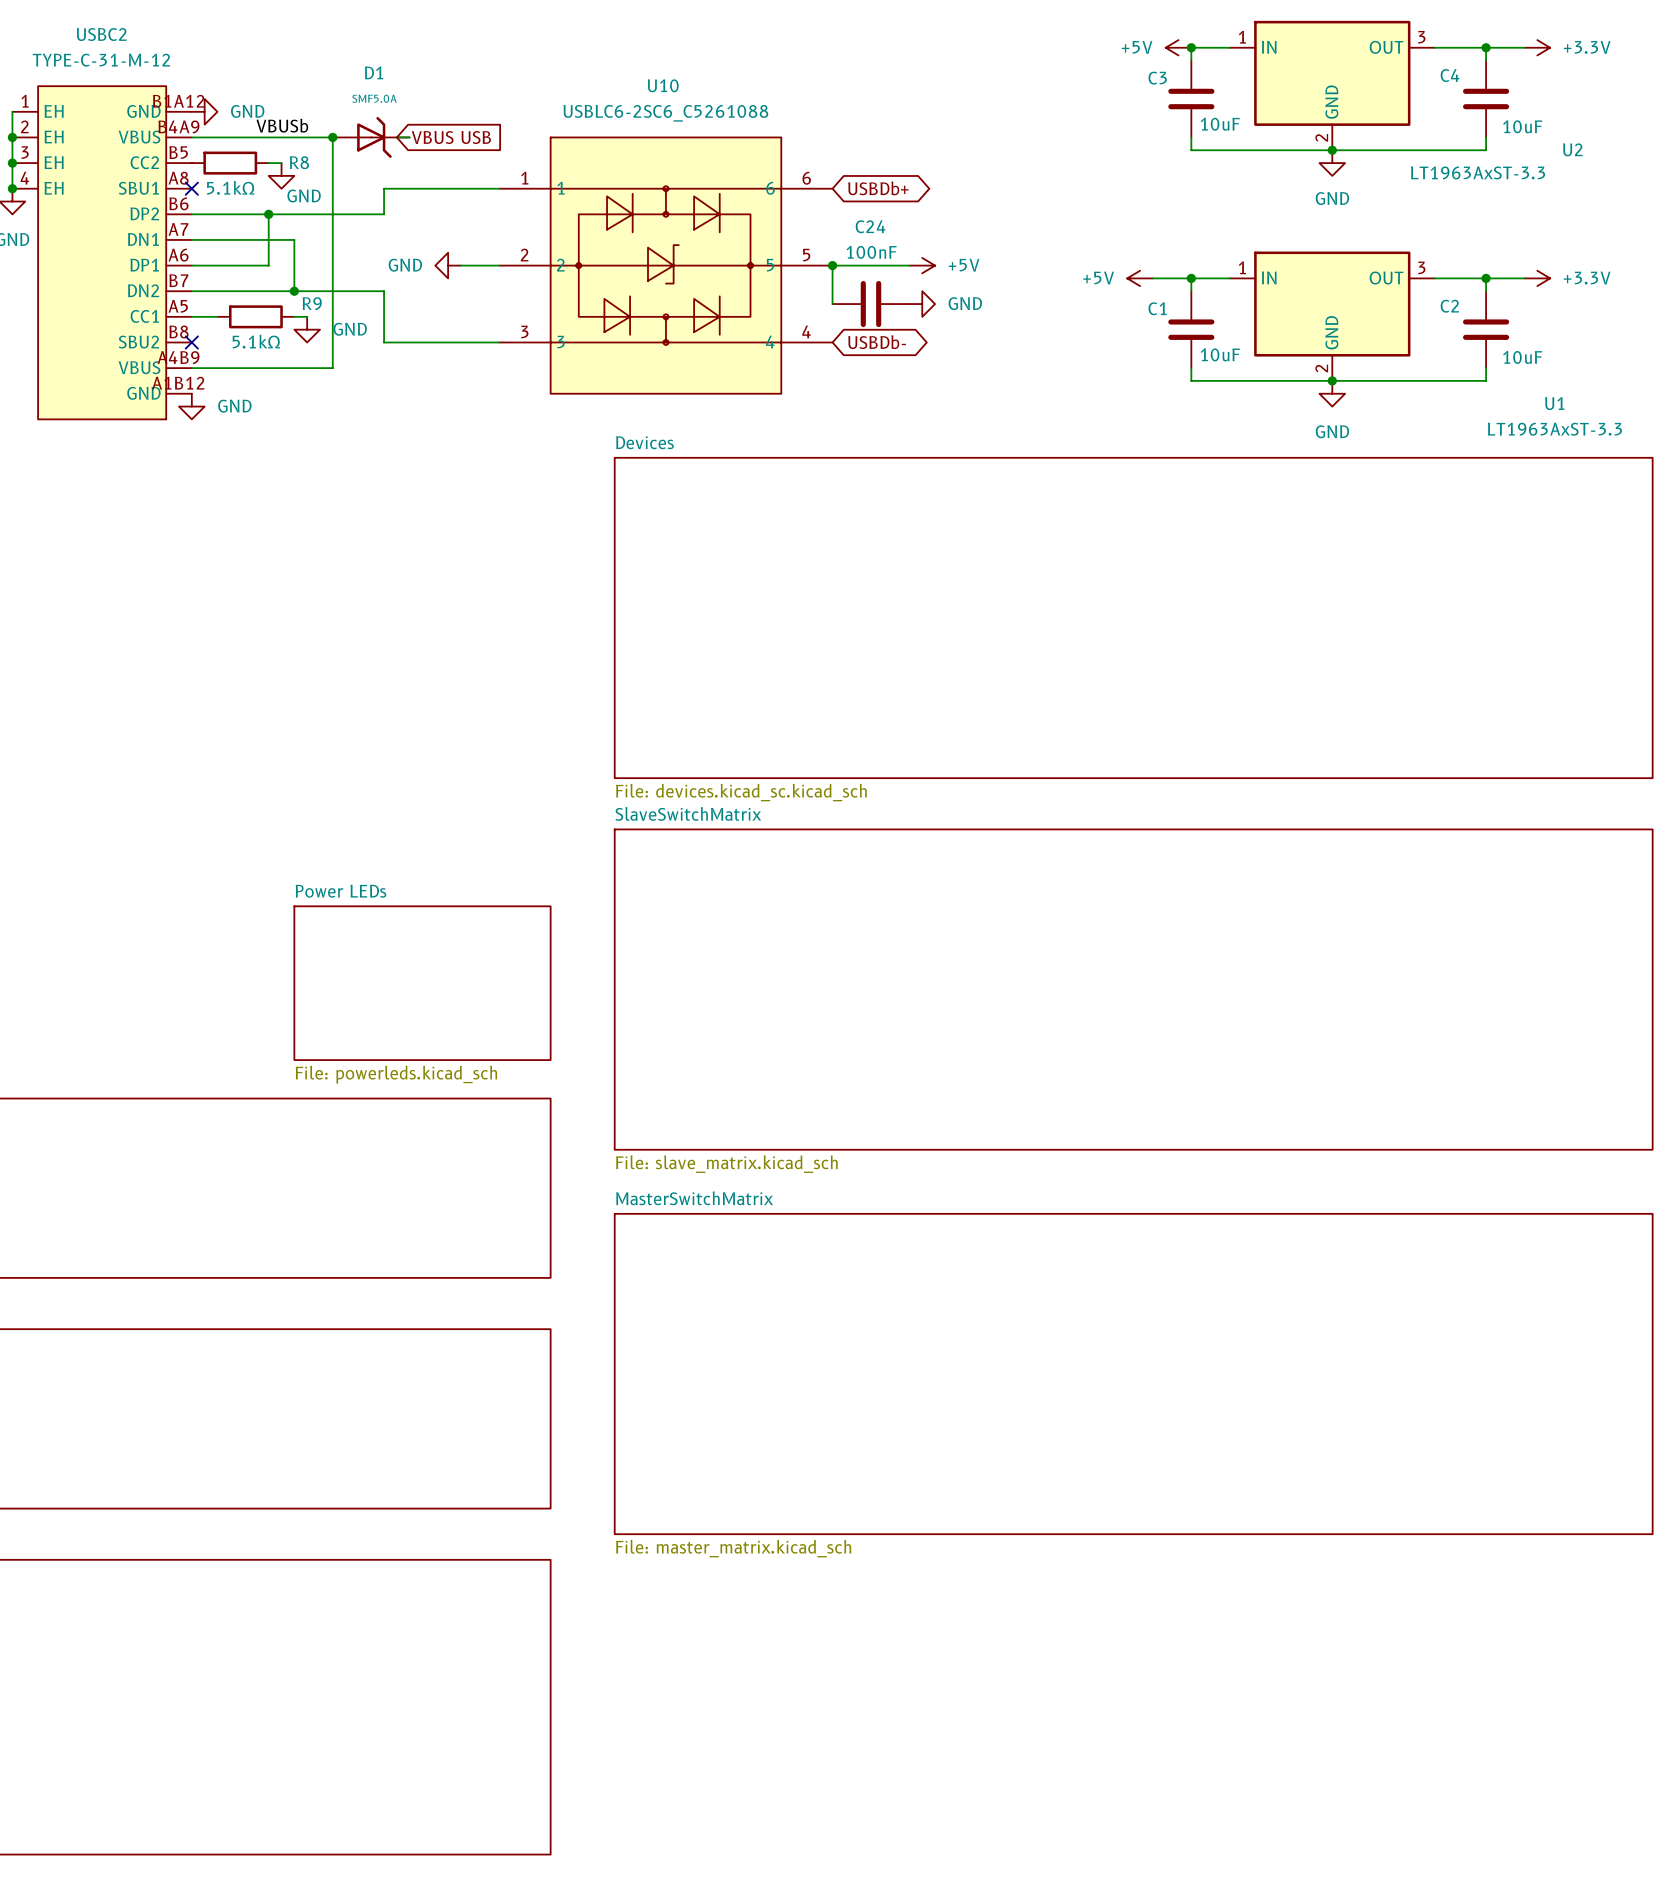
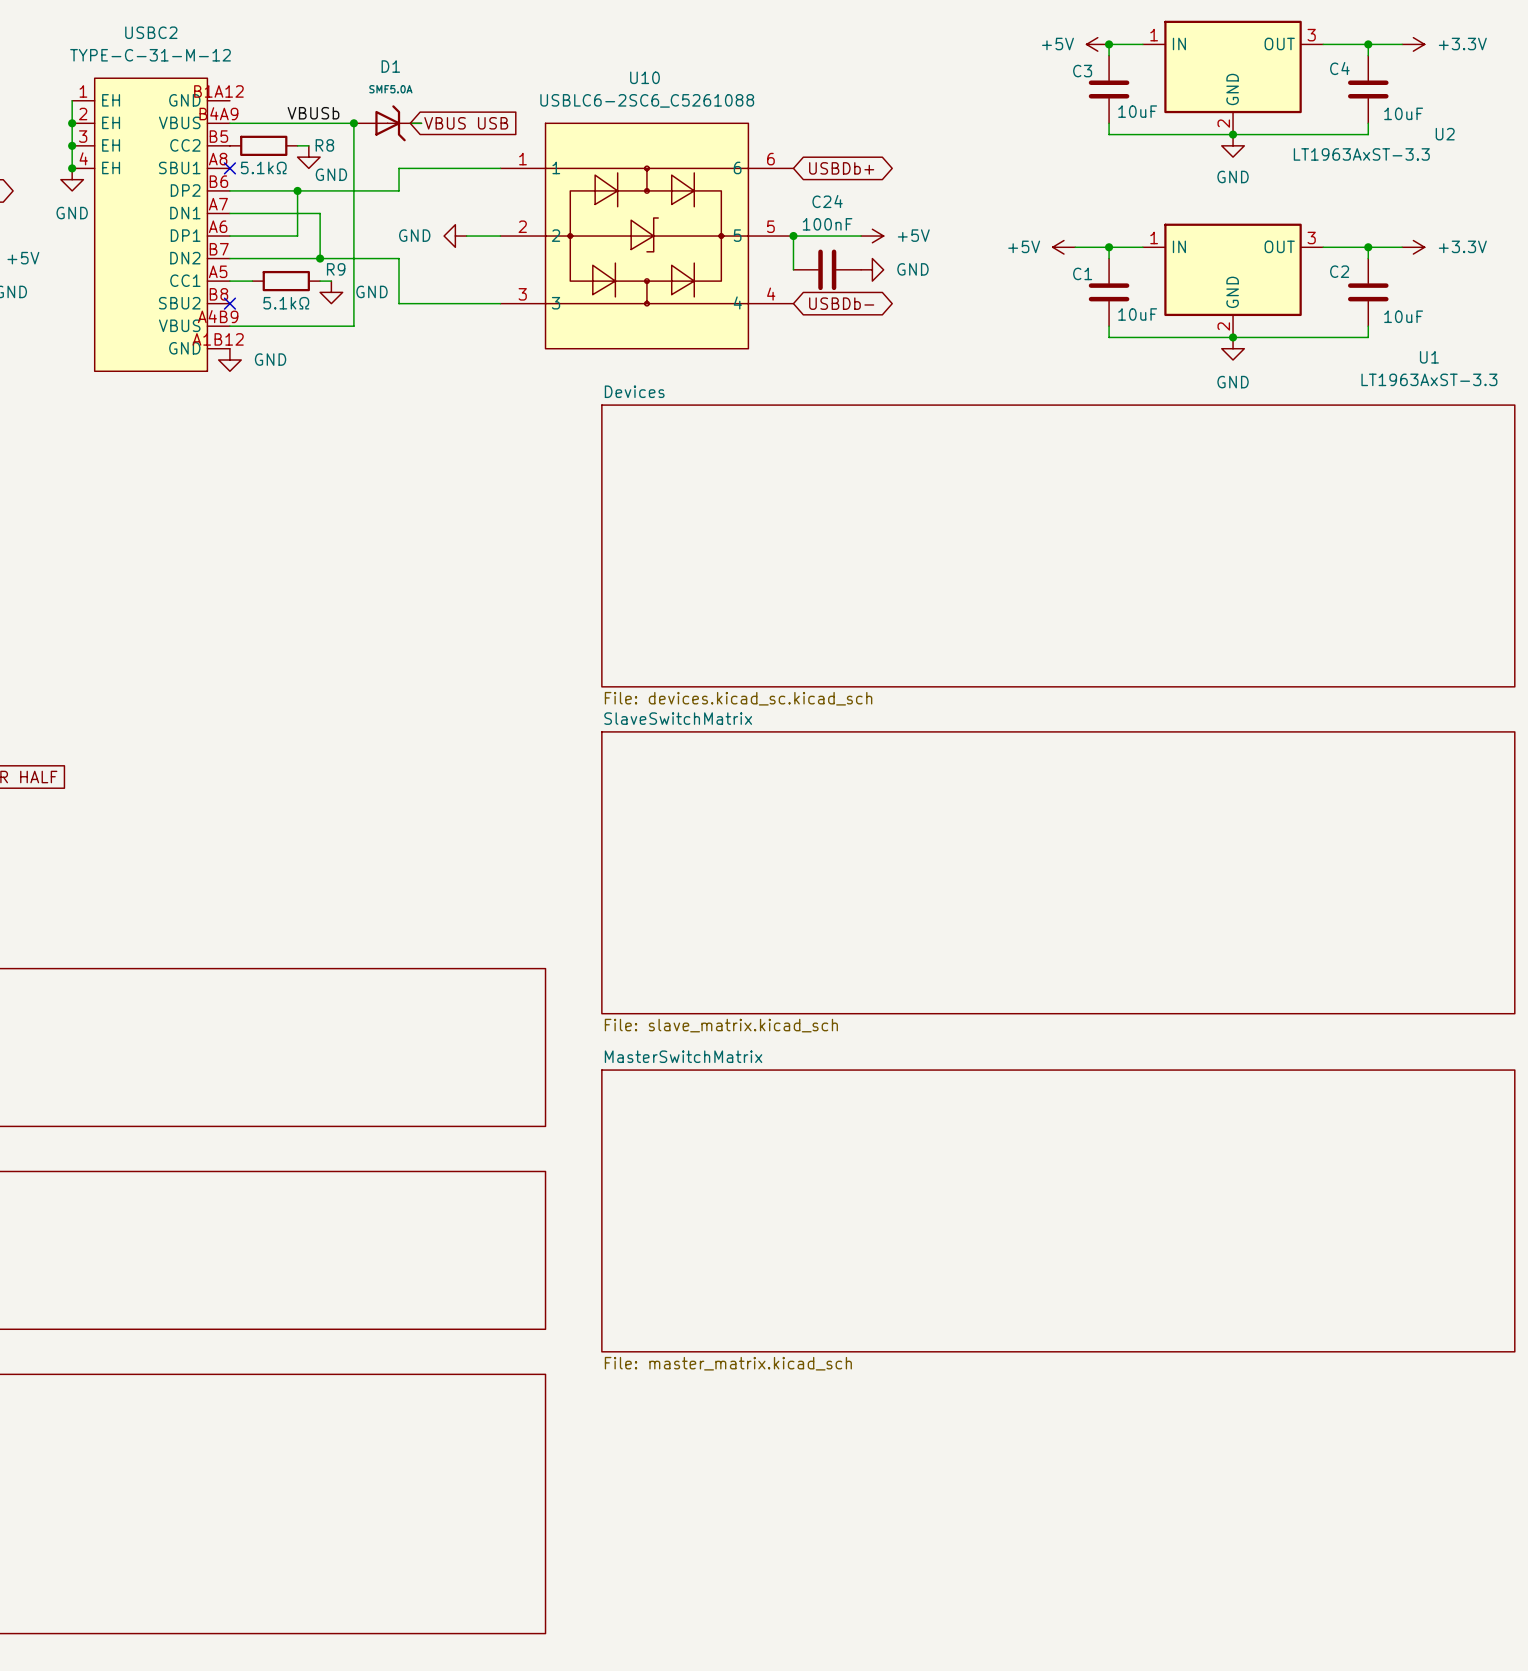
power symbol: GND (204, 111) -> none
sheet Power LEDs: File: powerleds.kicad_sch (422, 983) -> none

